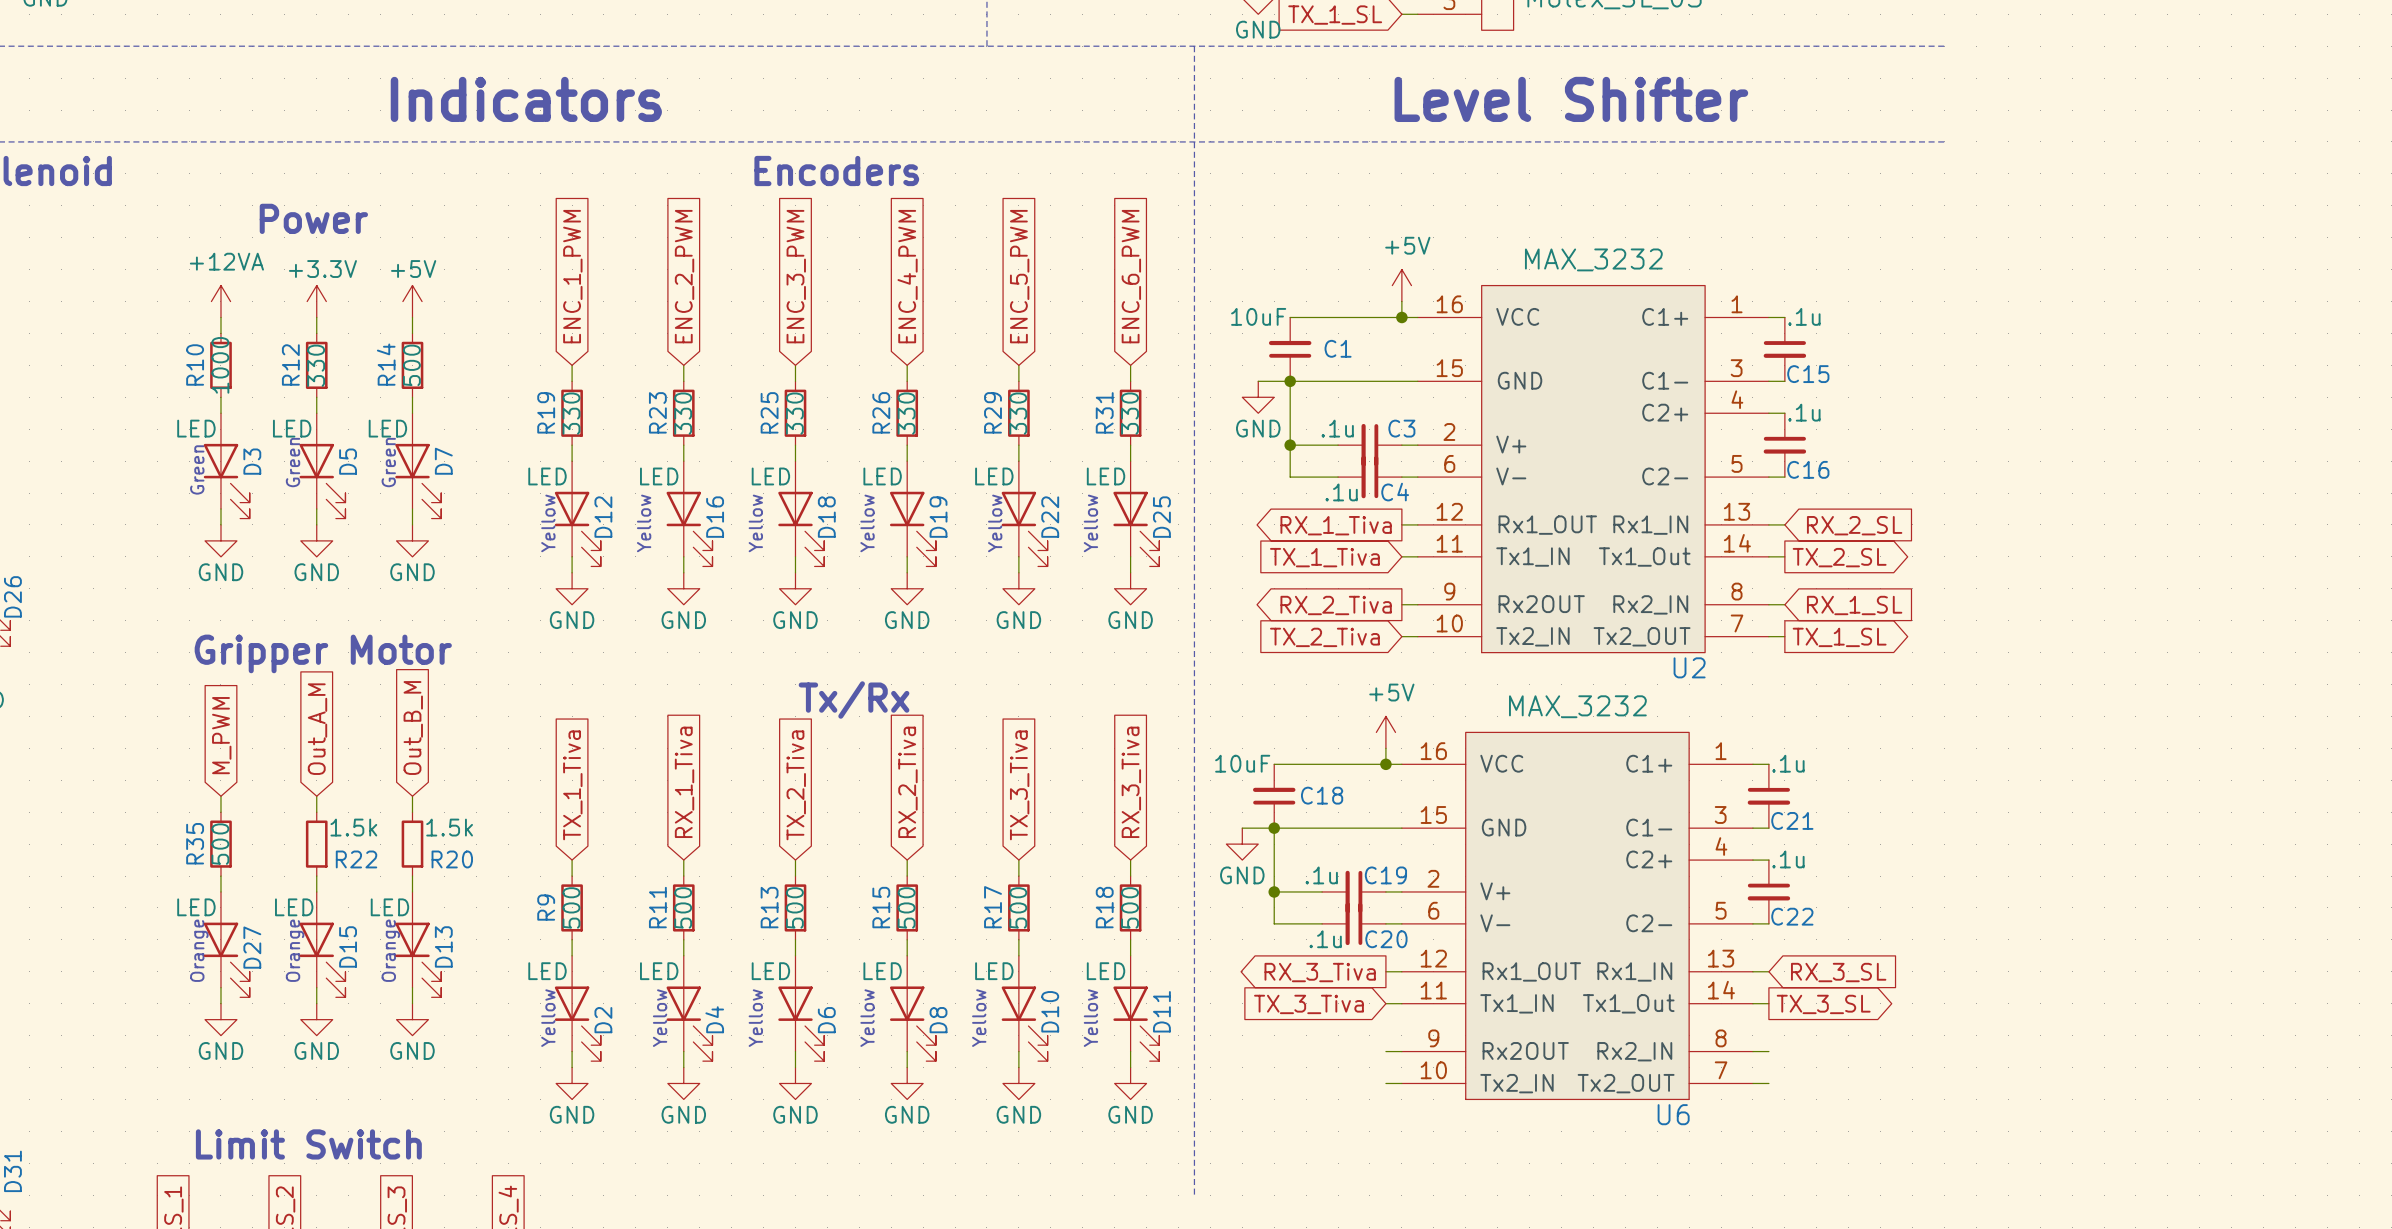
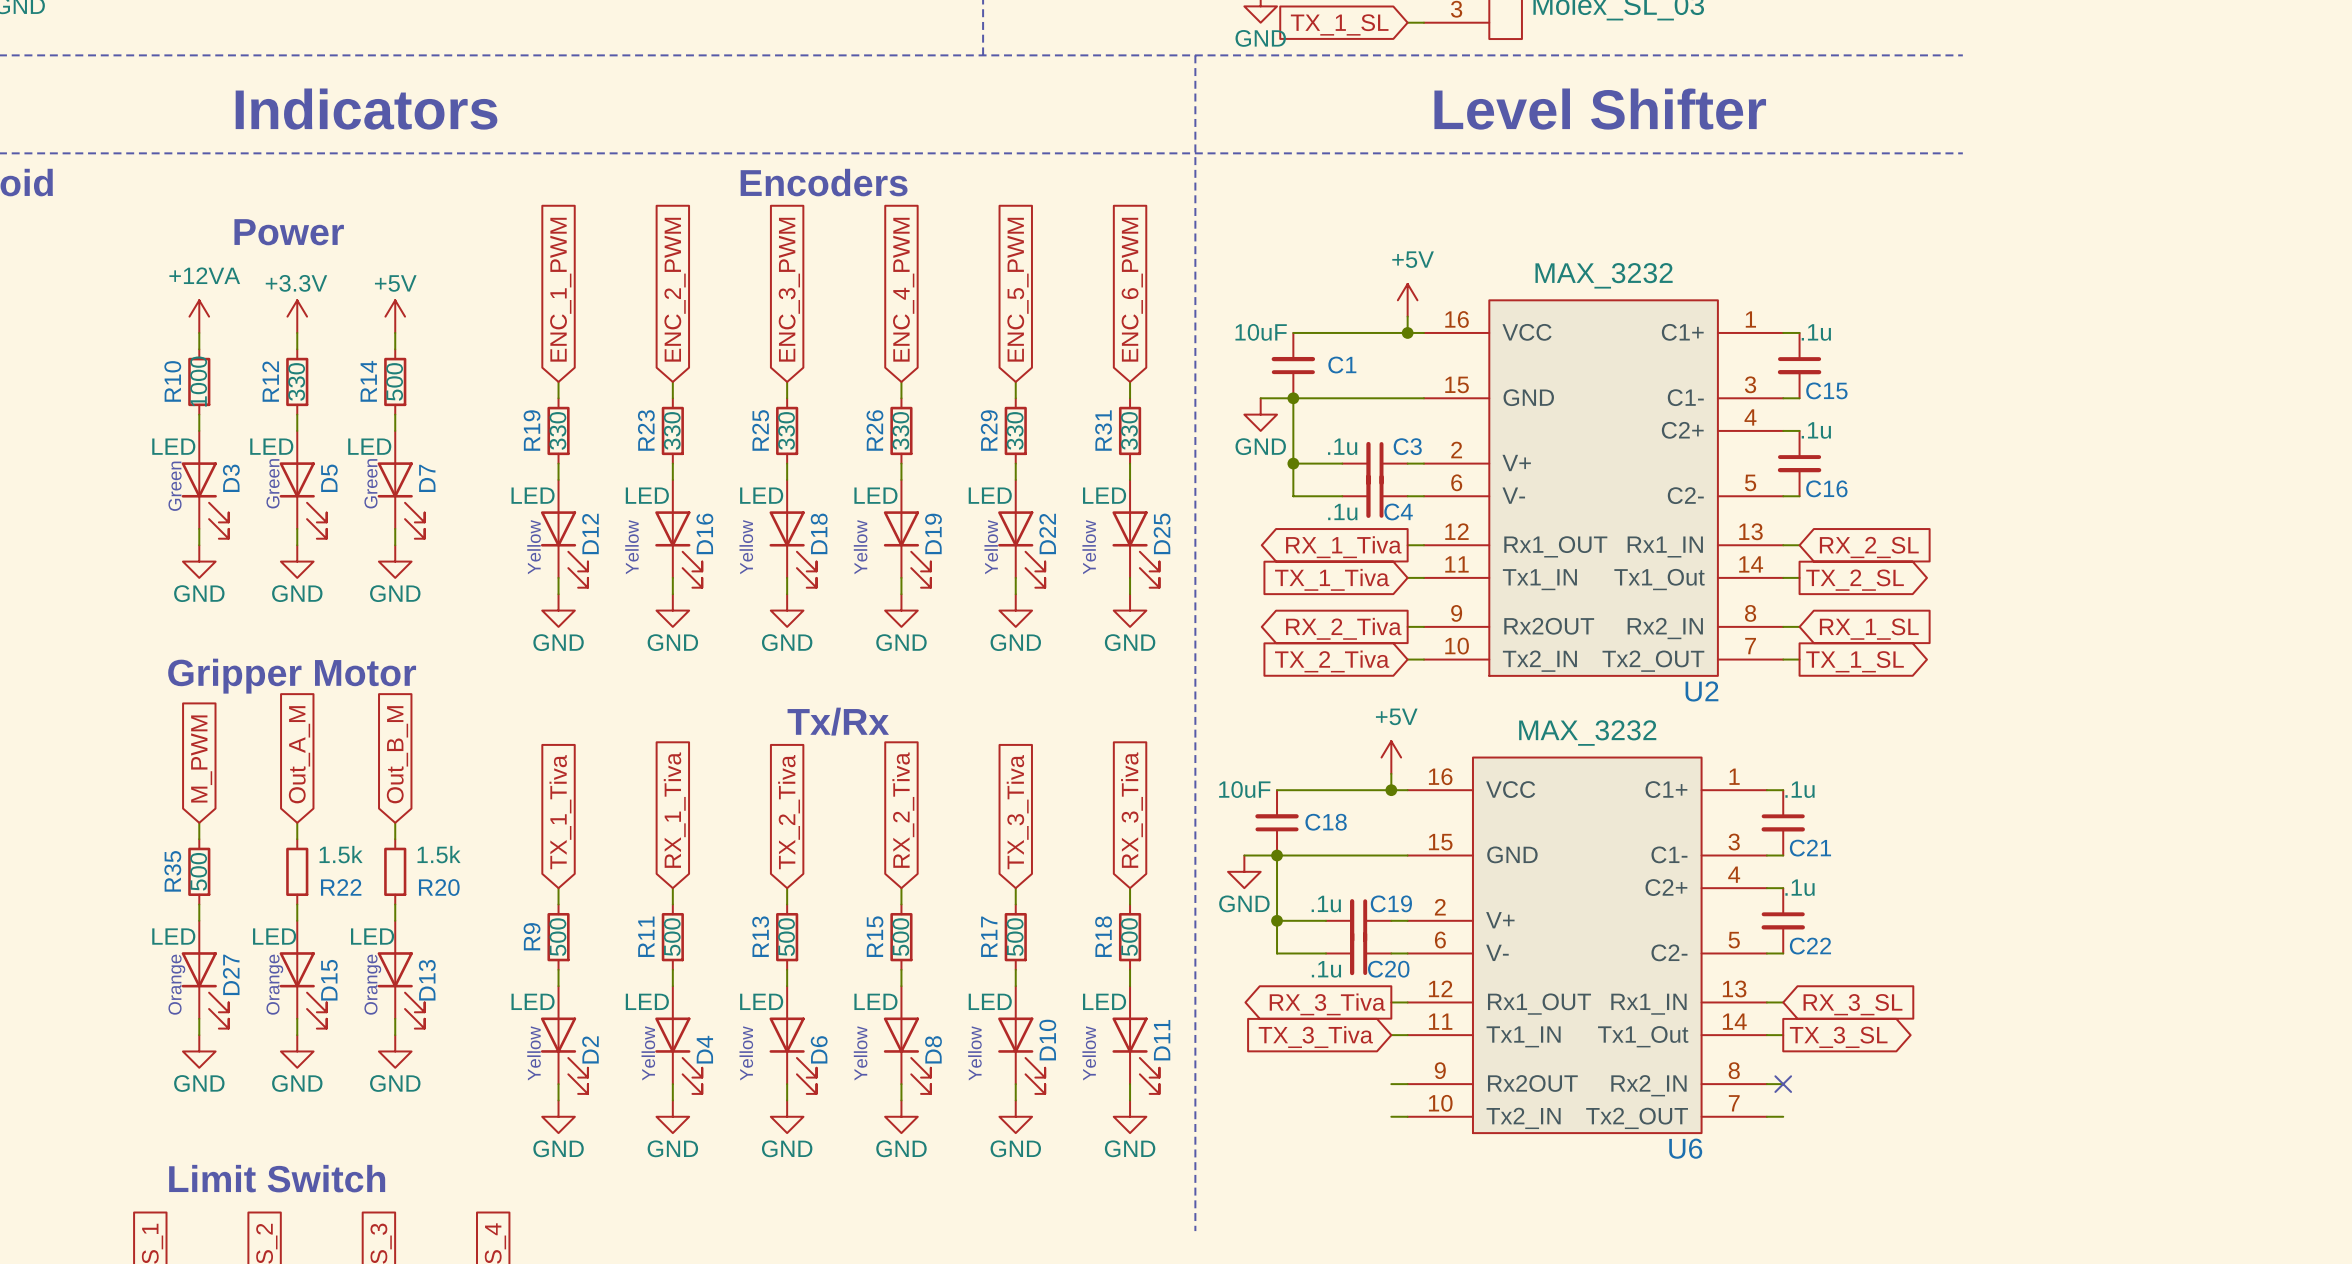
text position: Indicators (526, 99) -> Indicators (366, 109)
no-connect mark: none -> (1783, 1084)

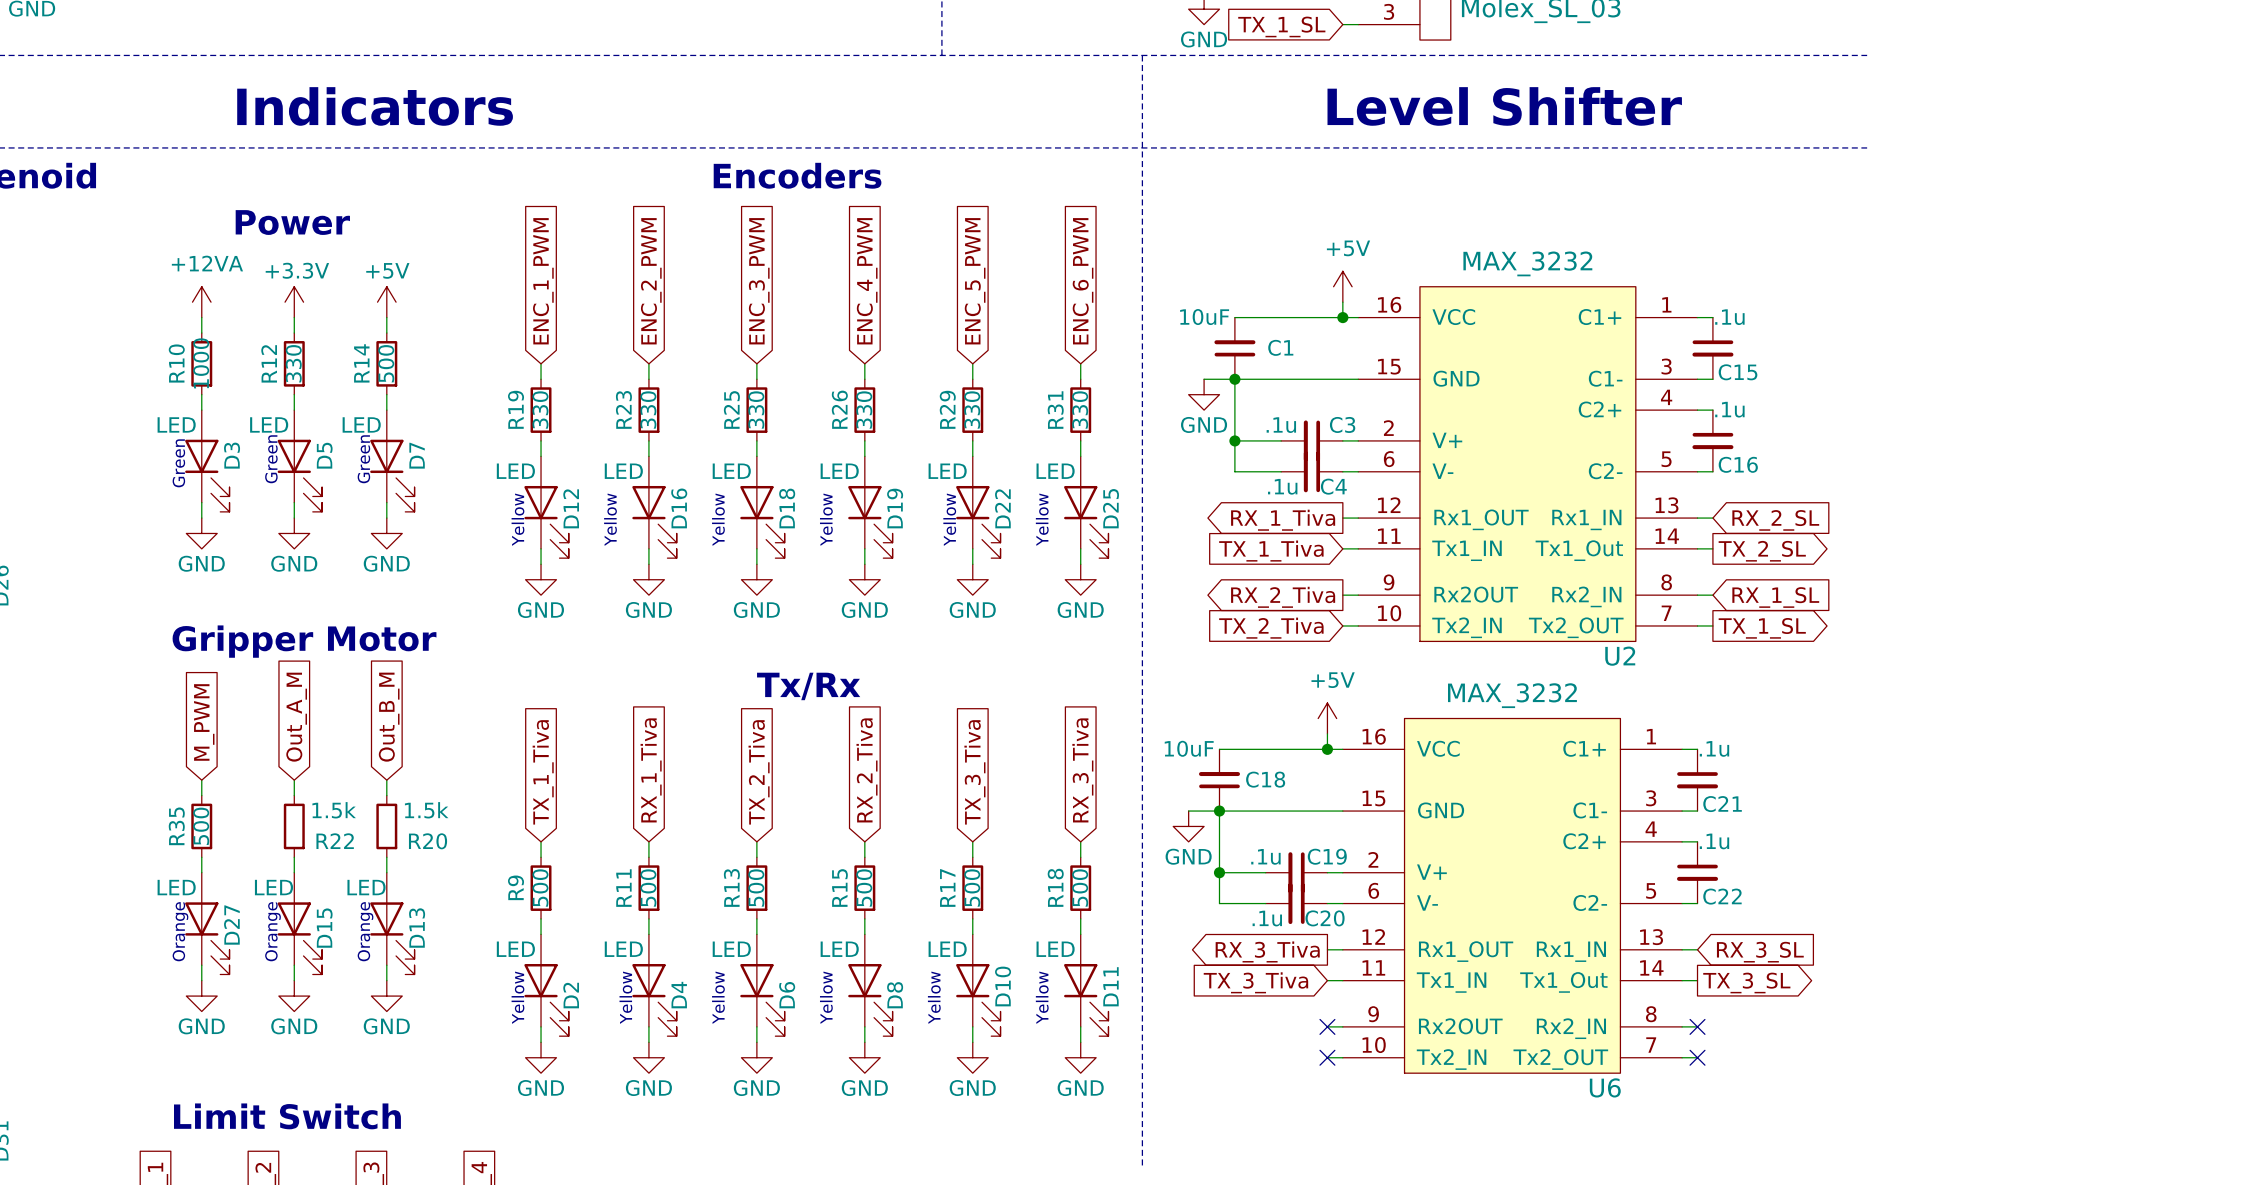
no-connect mark: none -> (1327, 1026)
no-connect mark: none -> (1327, 1057)
no-connect mark: none -> (1697, 1057)

